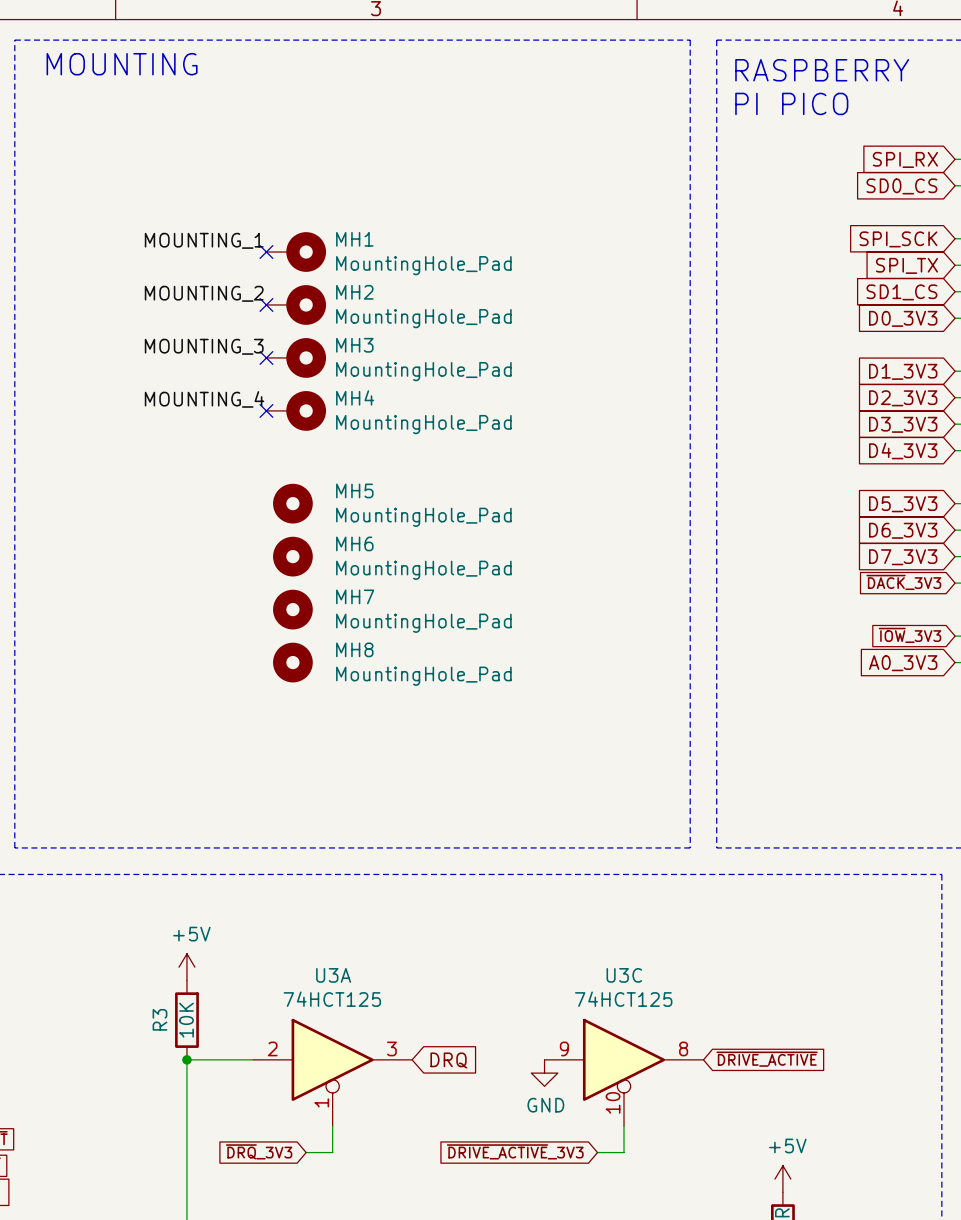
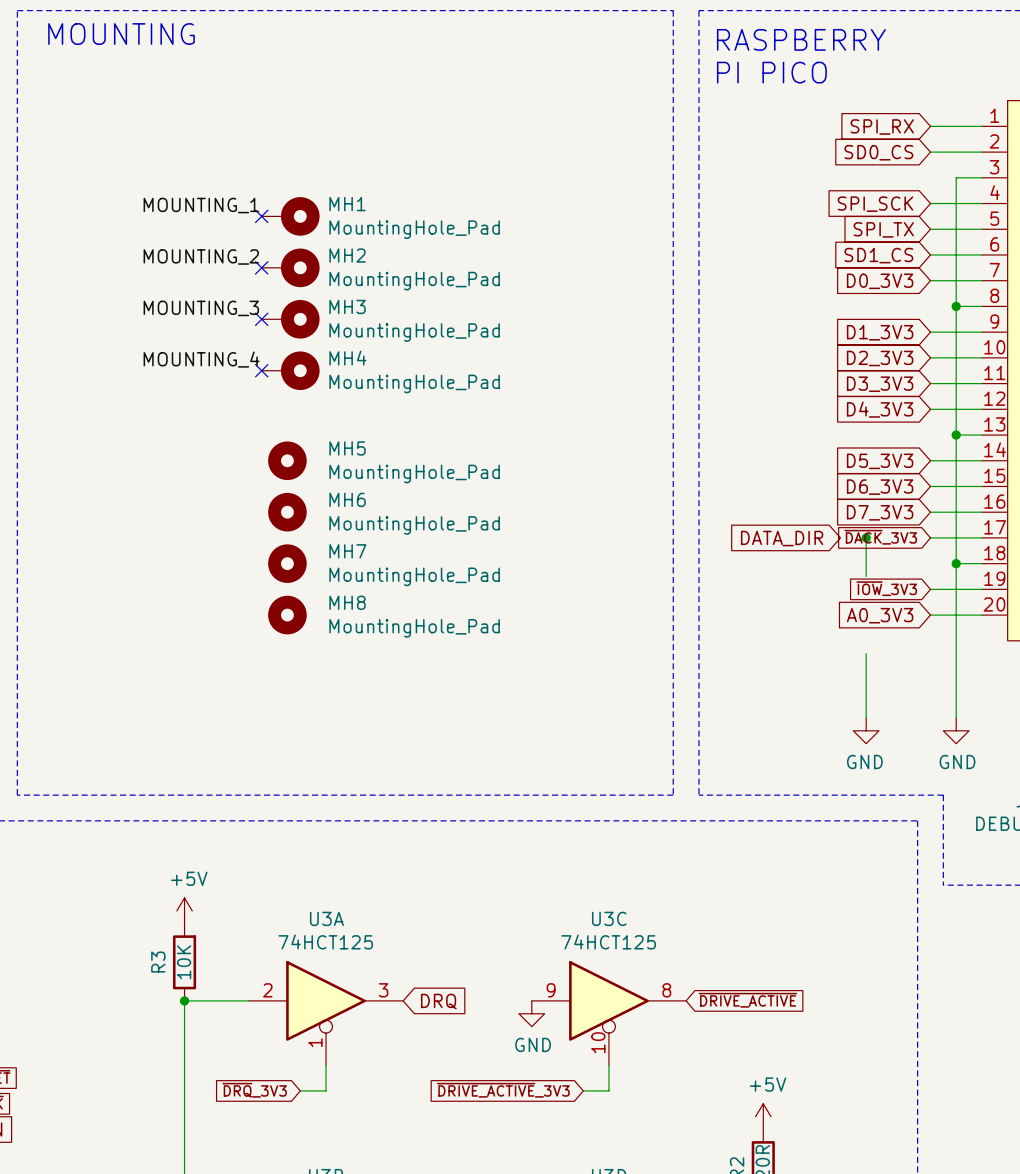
global label: none -> DATA_DIR (782, 538)
wire: none -> (866, 537) (866, 576)
junction: none -> (866, 537)
wire: none -> (866, 653) (866, 717)
power symbol: none -> GND (866, 730)

